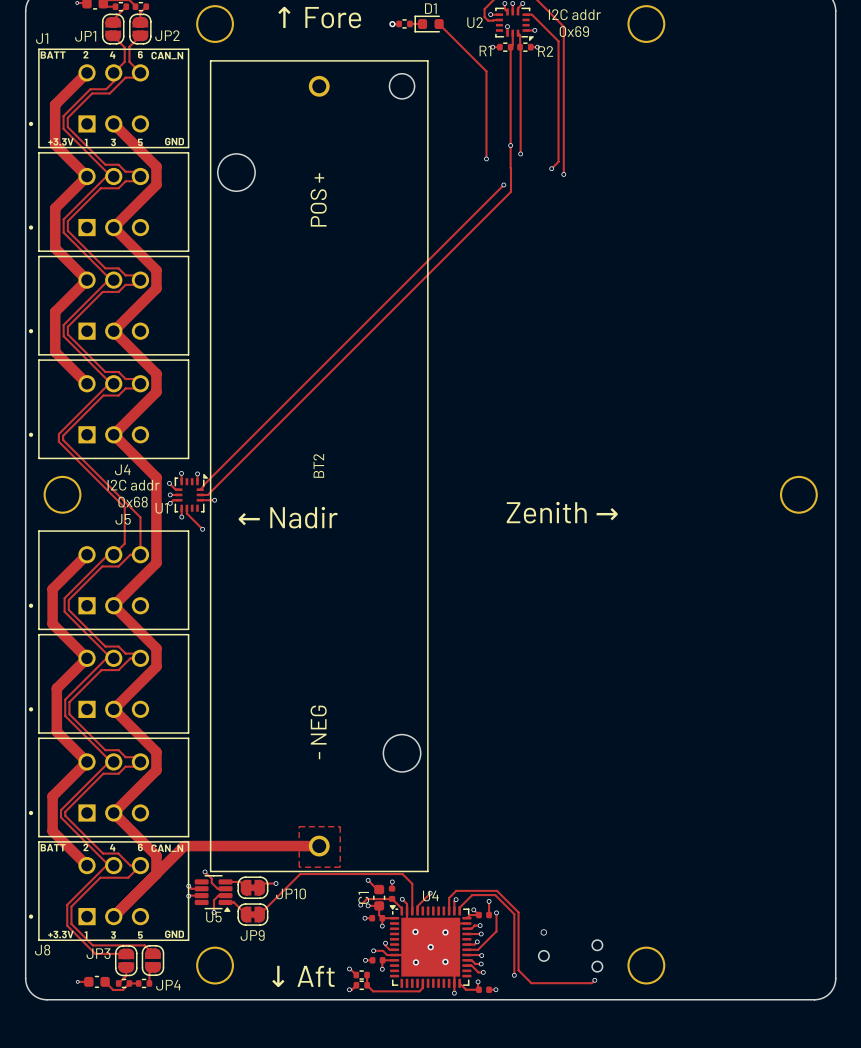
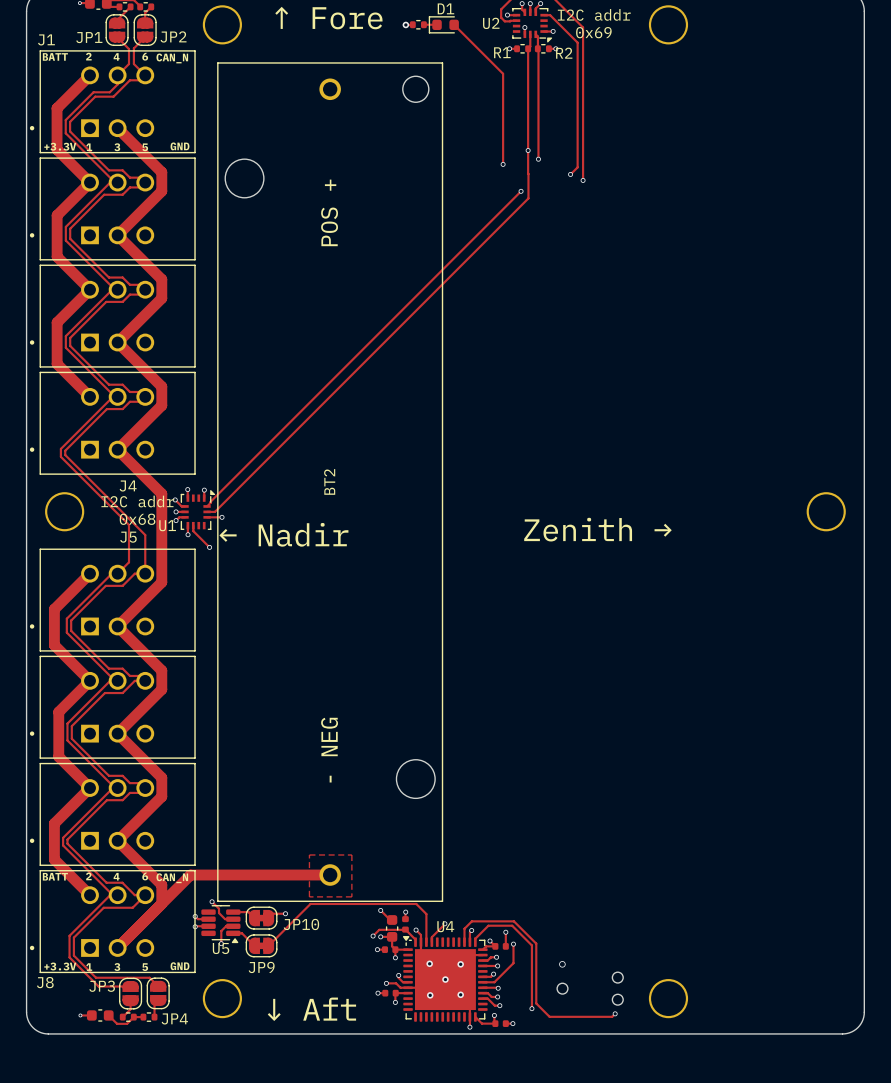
C1 name: C1 (363, 897) -> none
track: (349, 968) (356, 975) -> none
via: (349, 968) -> none
part: (361, 975) -> none
track: (367, 975) (367, 985) (373, 991) (419, 991) (422, 988) (422, 983) -> none
track: (356, 985) (349, 989) -> none
part: (361, 985) -> none
via: (349, 989) -> none

